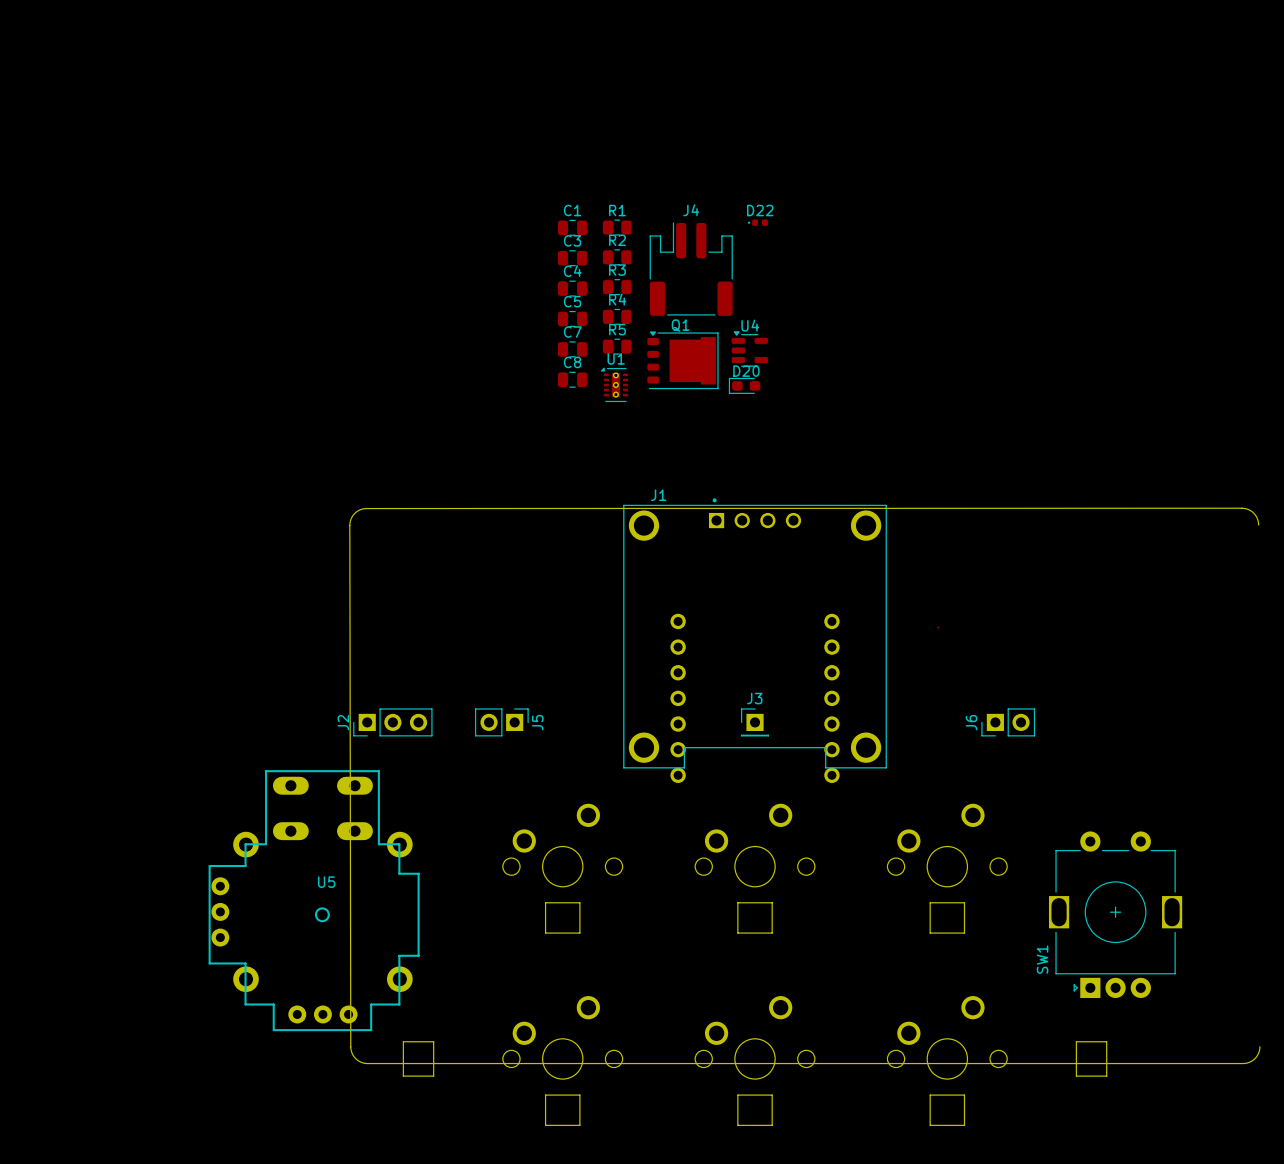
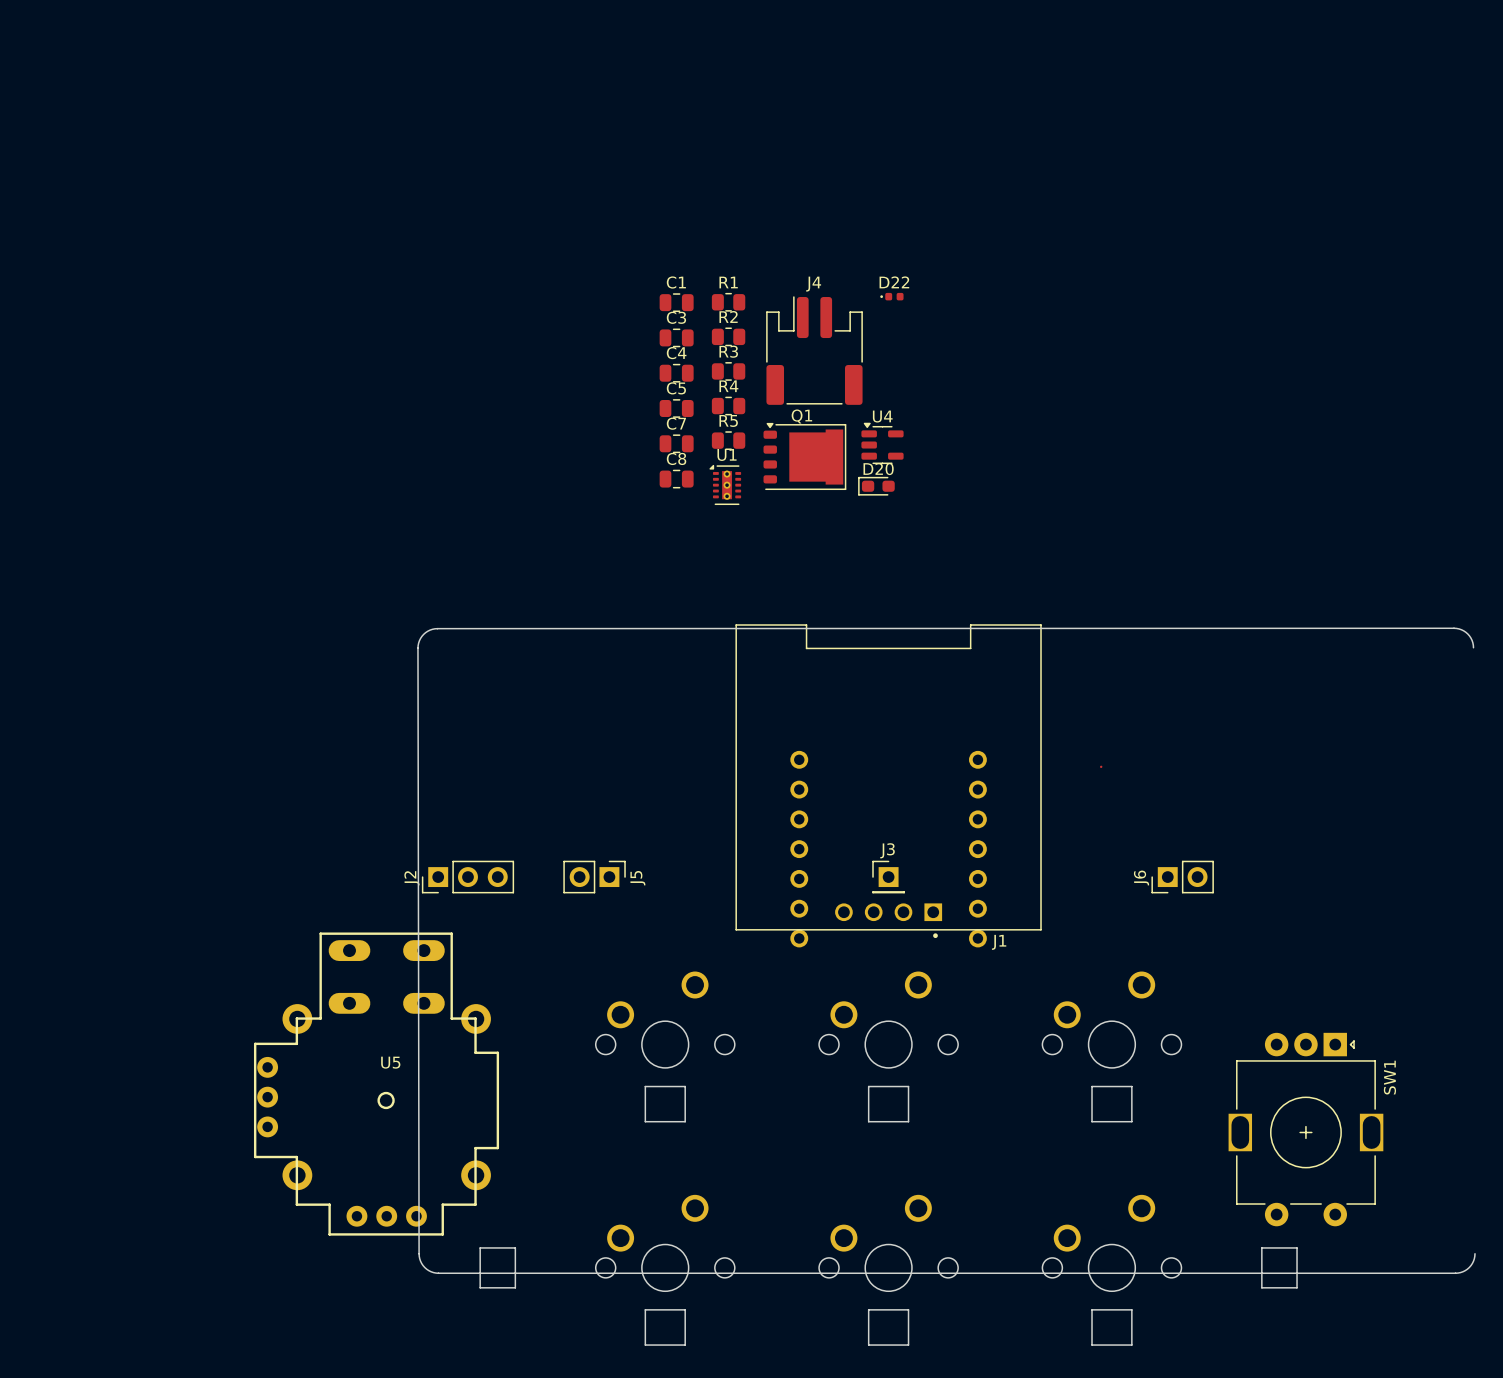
J1 name position: J1 (658, 495) -> J1 (999, 942)
J1 footprint: [623, 498, 887, 769] -> [735, 624, 1042, 939]
SW1 rotation: 0° (1115, 914) -> 180° (1305, 1129)

